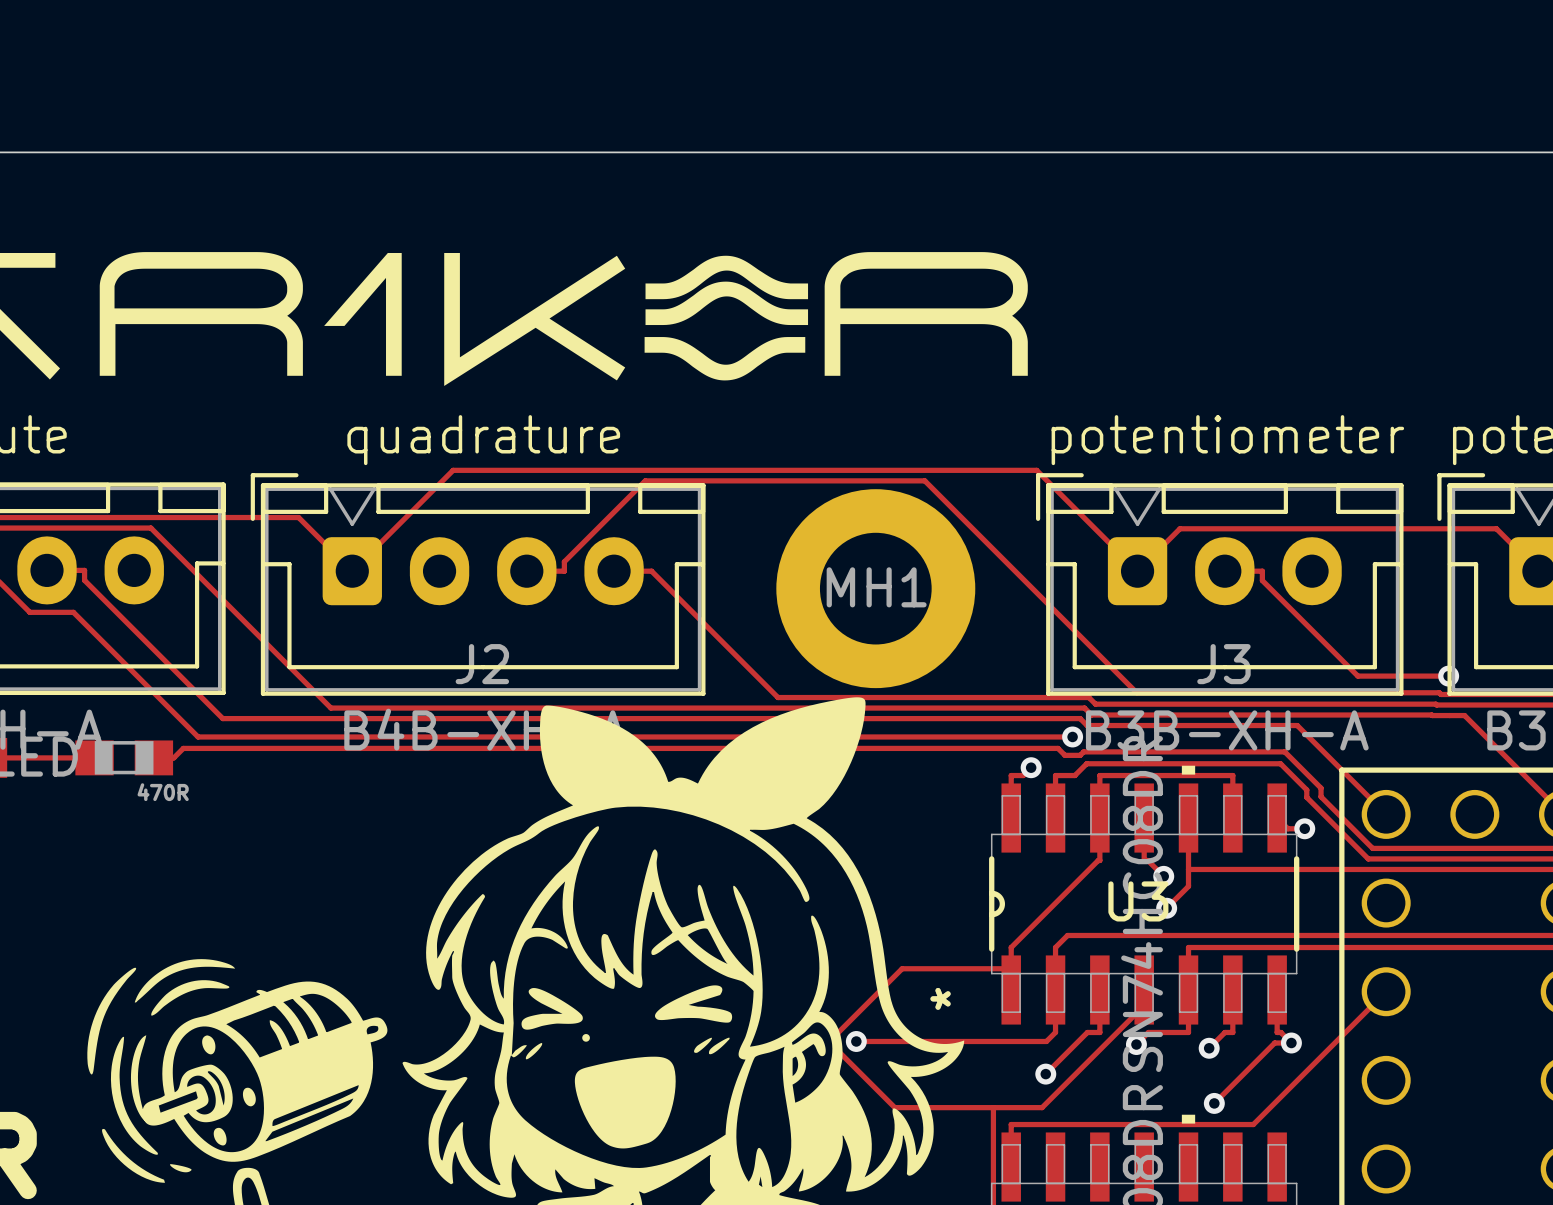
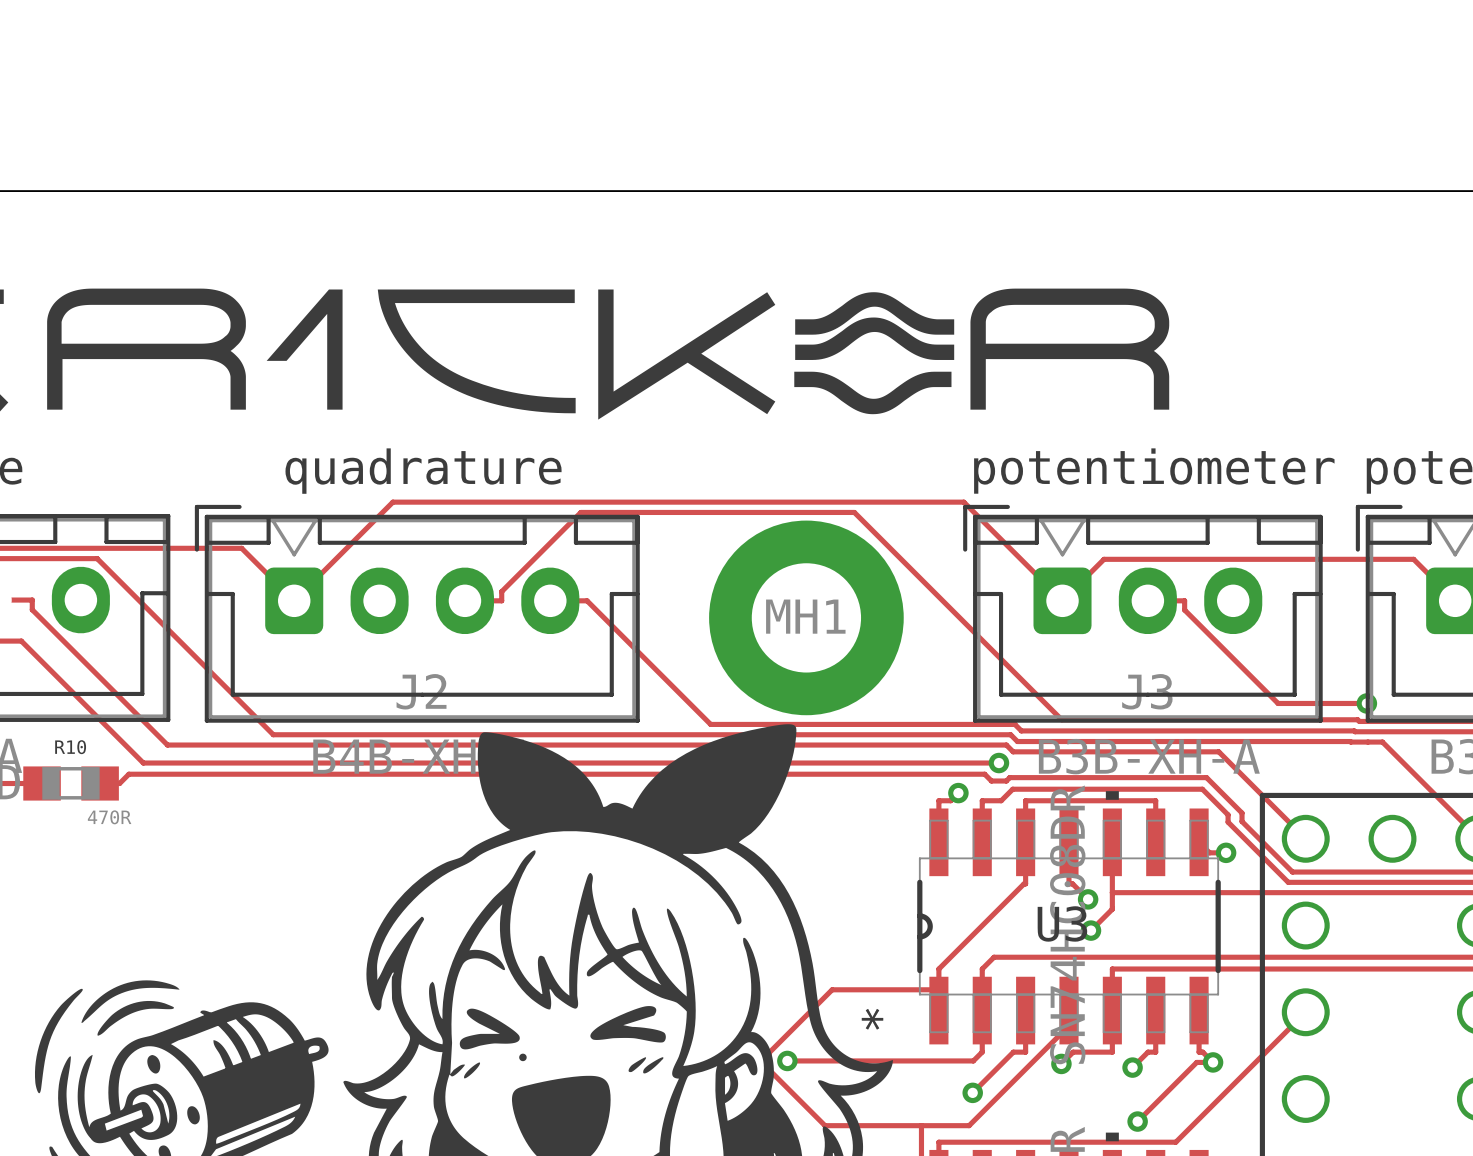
drawing: none -> [377, 289, 576, 414]
drawing position: (726, 277) -> (874, 313)
drawing position: (726, 303) -> (874, 338)
drawing position: (926, 313) -> (1069, 349)
drawing position: (534, 319) -> (686, 354)
drawing position: (724, 358) -> (872, 392)
R10 name: none -> R10 (70, 747)

